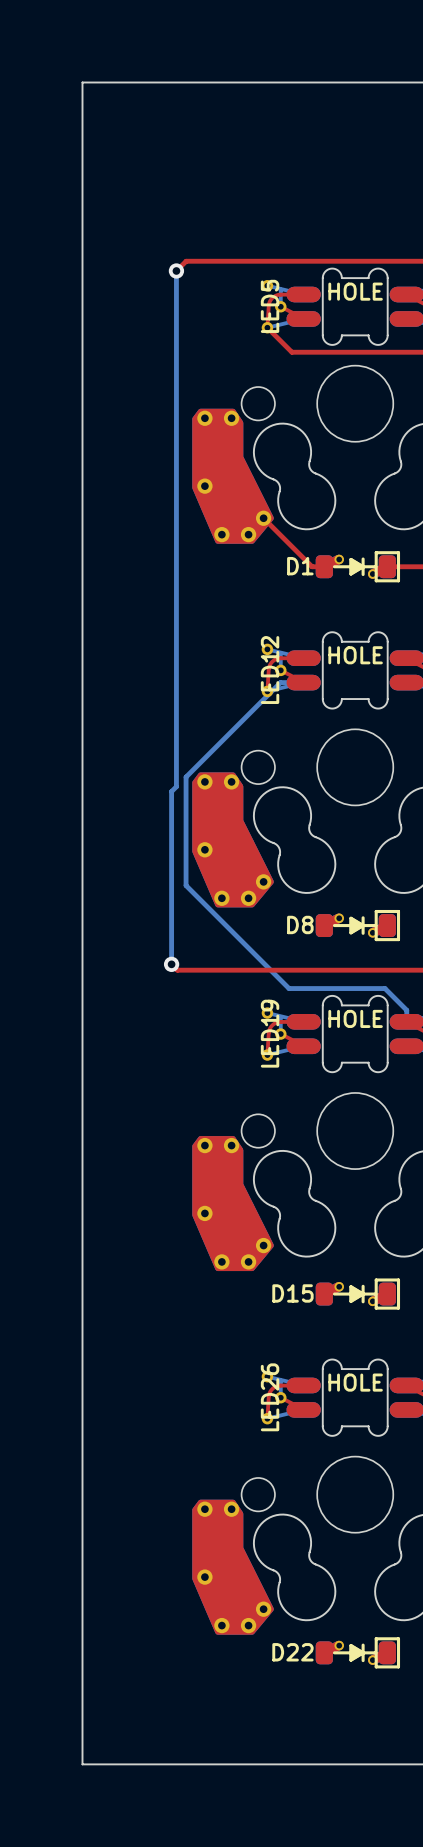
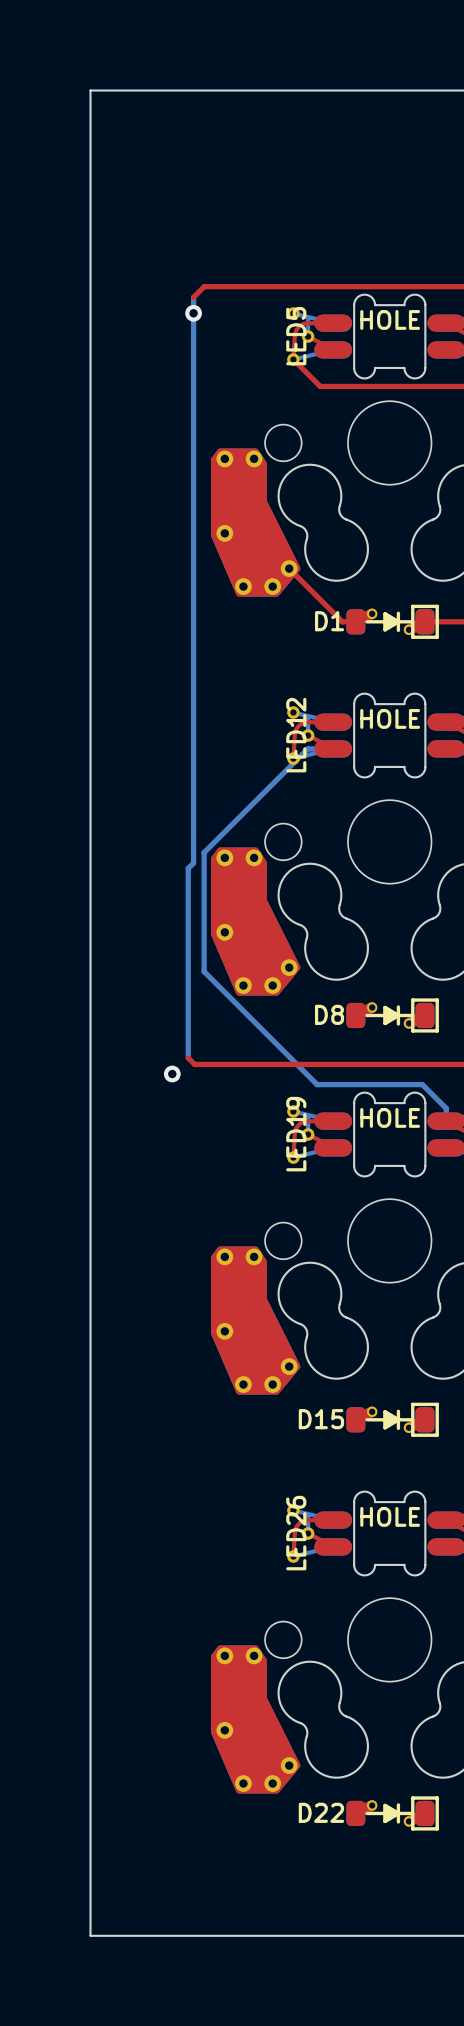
via position: (176, 270) -> (193, 313)
via position: (171, 964) -> (172, 1074)

